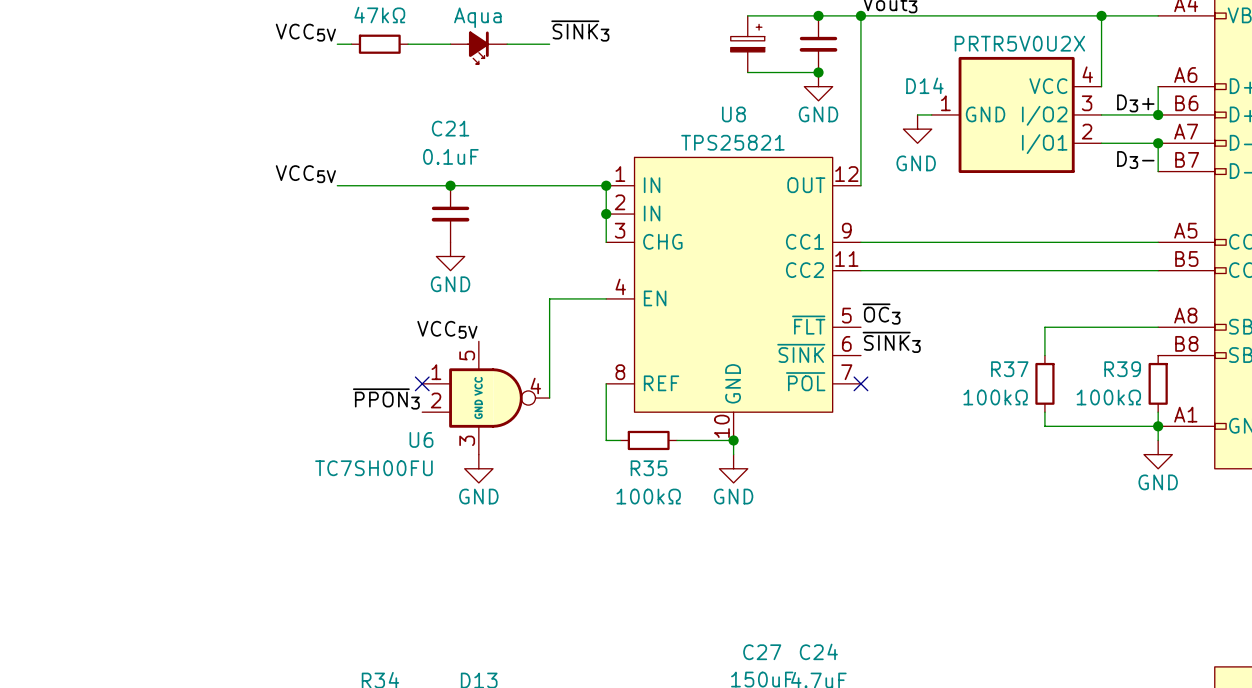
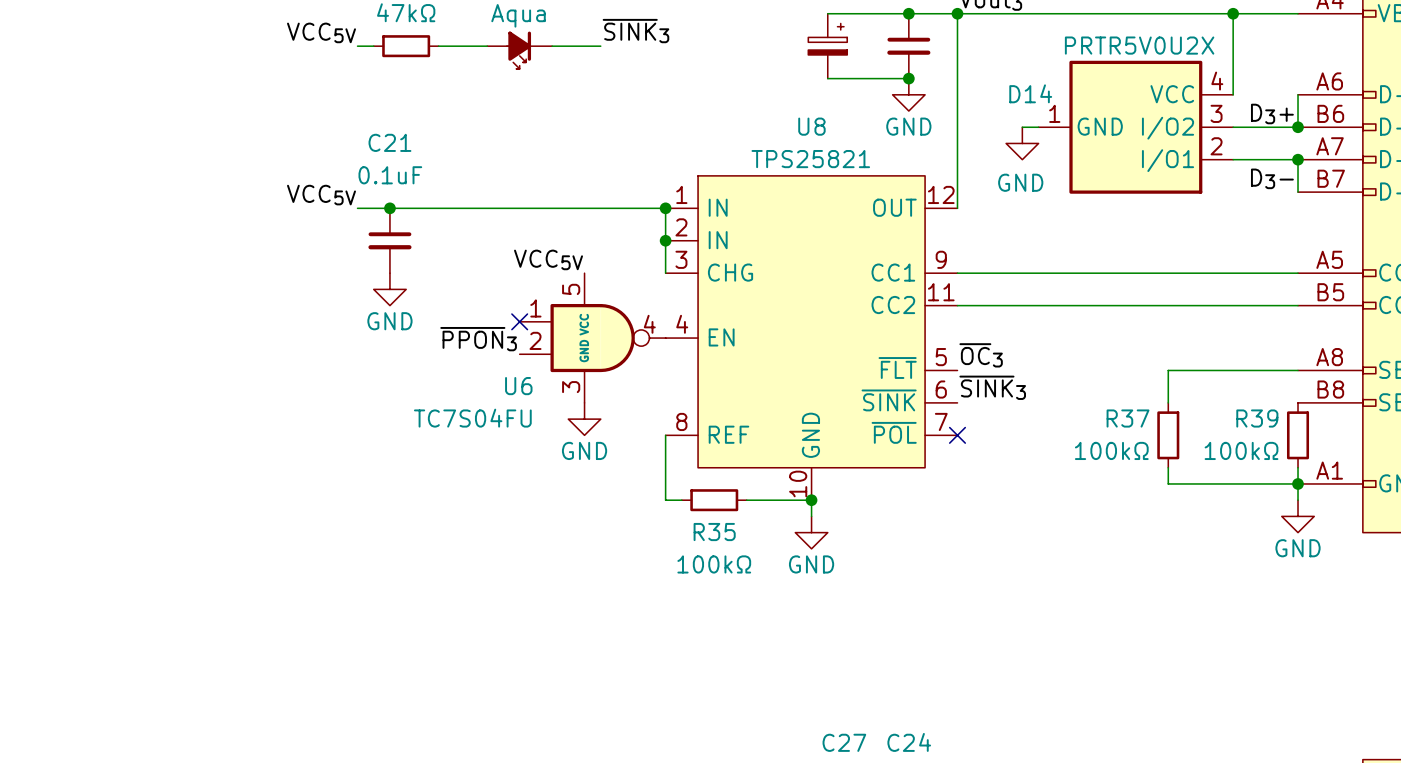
junction: none -> (389, 208)
junction: (450, 185) -> none
C21 position: (450, 214) -> (389, 240)
power symbol: none -> GND (389, 289)
power symbol: GND (450, 256) -> none
no-connect mark: none -> (519, 321)
wire: (606, 298) (549, 298) (549, 398) -> none
label position: VCC5V (447, 329) -> VCC5V (548, 259)
power symbol: none -> GND (584, 419)
no-connect mark: (422, 383) -> none
label position: ~{PPON}3 (386, 398) -> ~{PPON}3 (478, 339)
U6 position: (485, 398) -> (592, 338)
U6 value: TC7SH00FU (373, 468) -> TC7S04FU (472, 418)
power symbol: GND (478, 468) -> none

